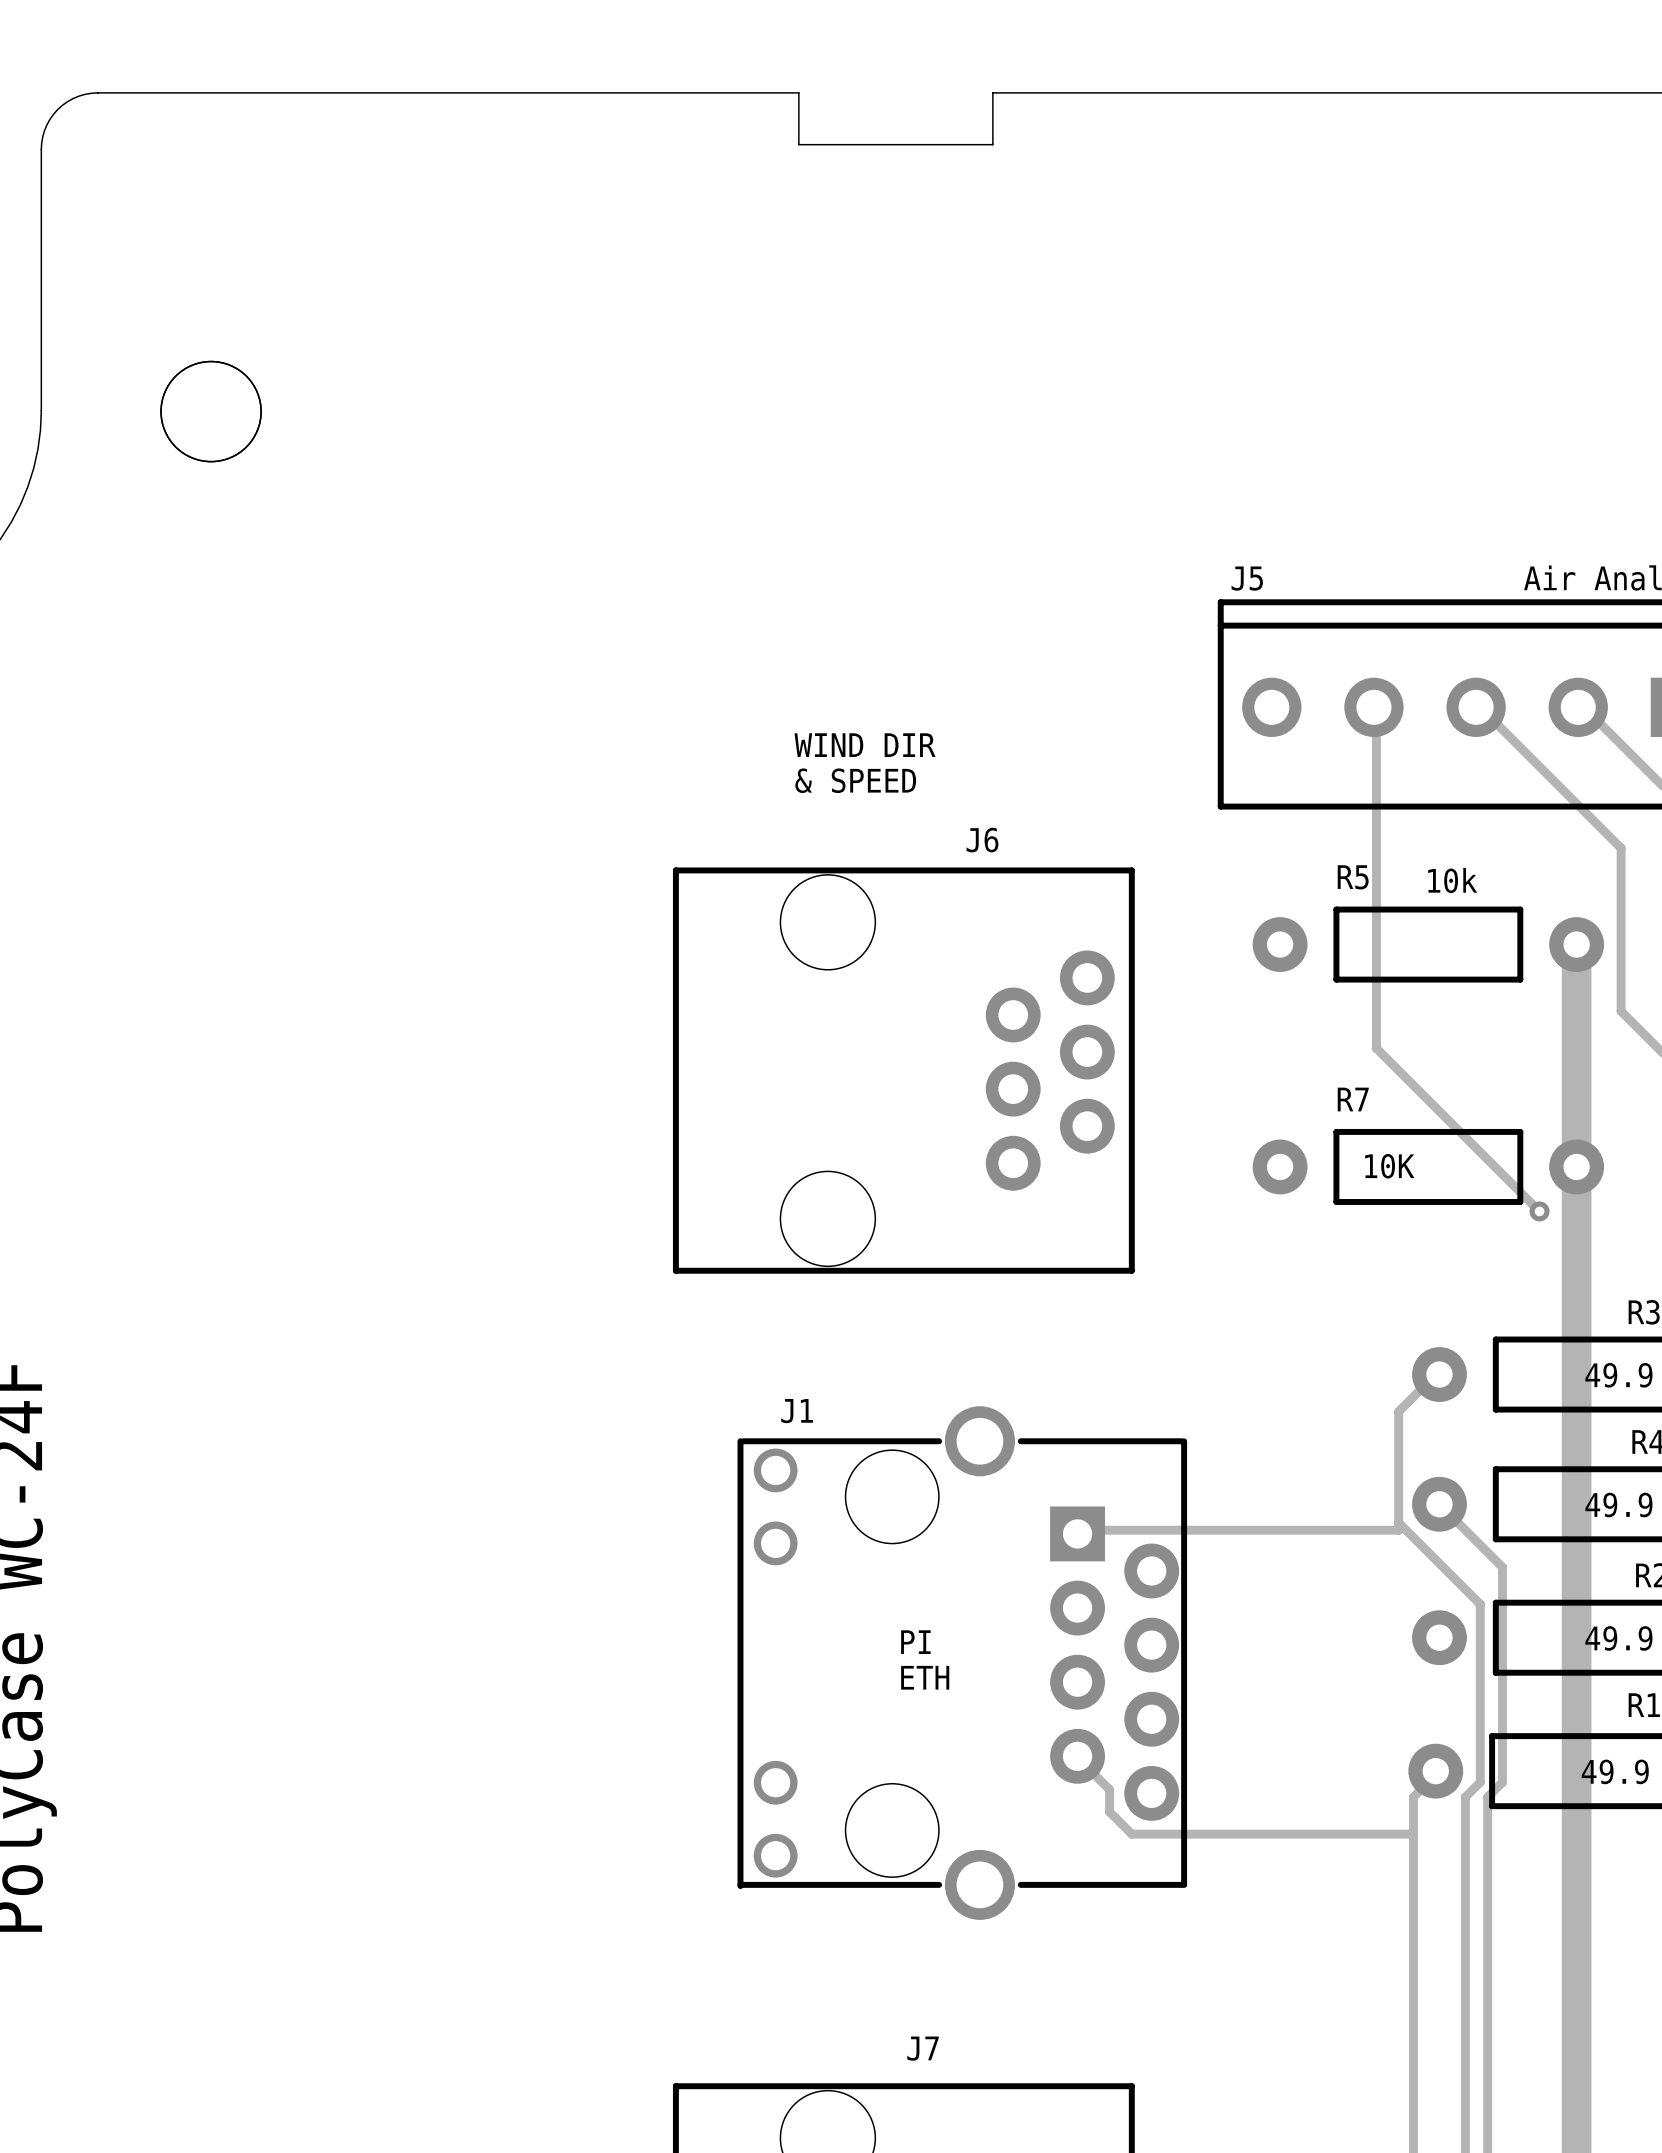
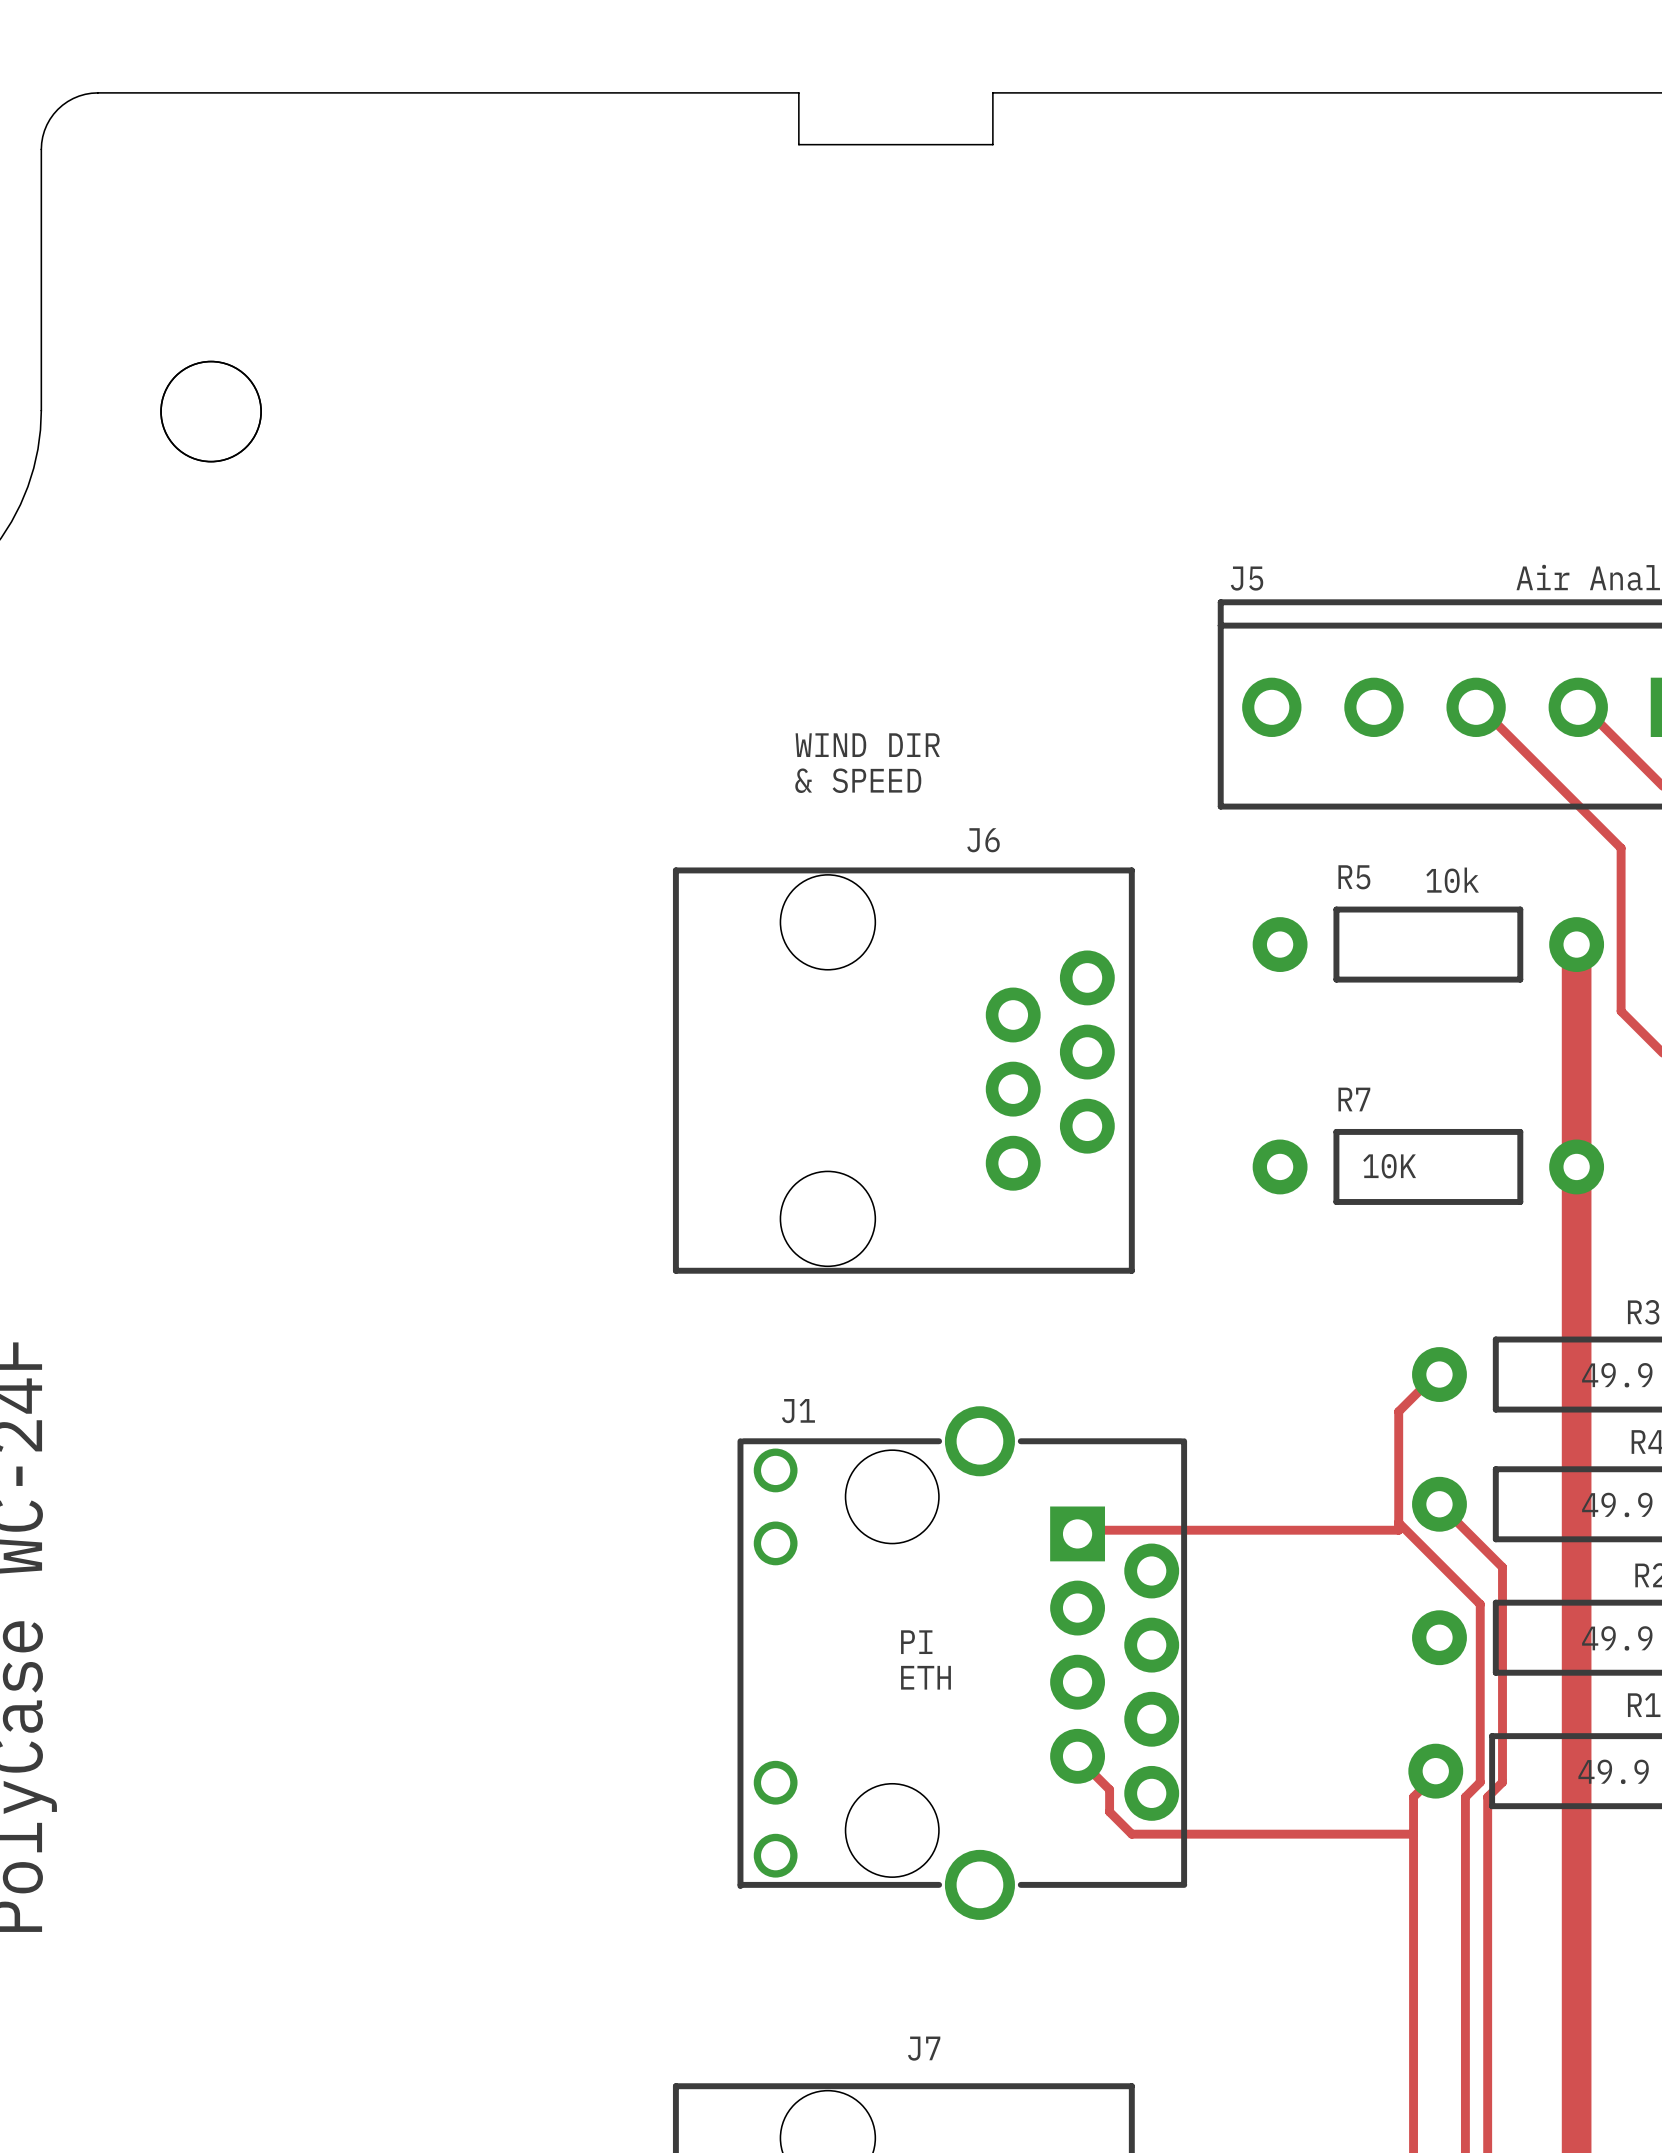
track: (1373, 707) (1376, 707) (1376, 1048) (1539, 1211) -> none
via: (1539, 1211) -> none

